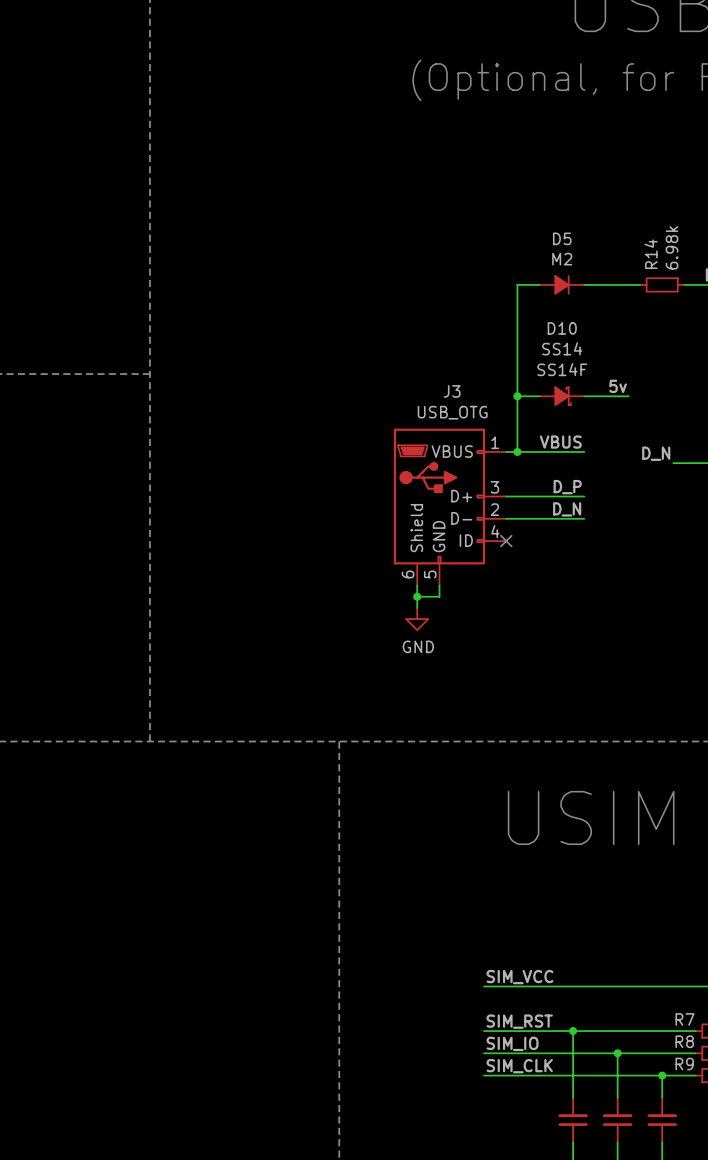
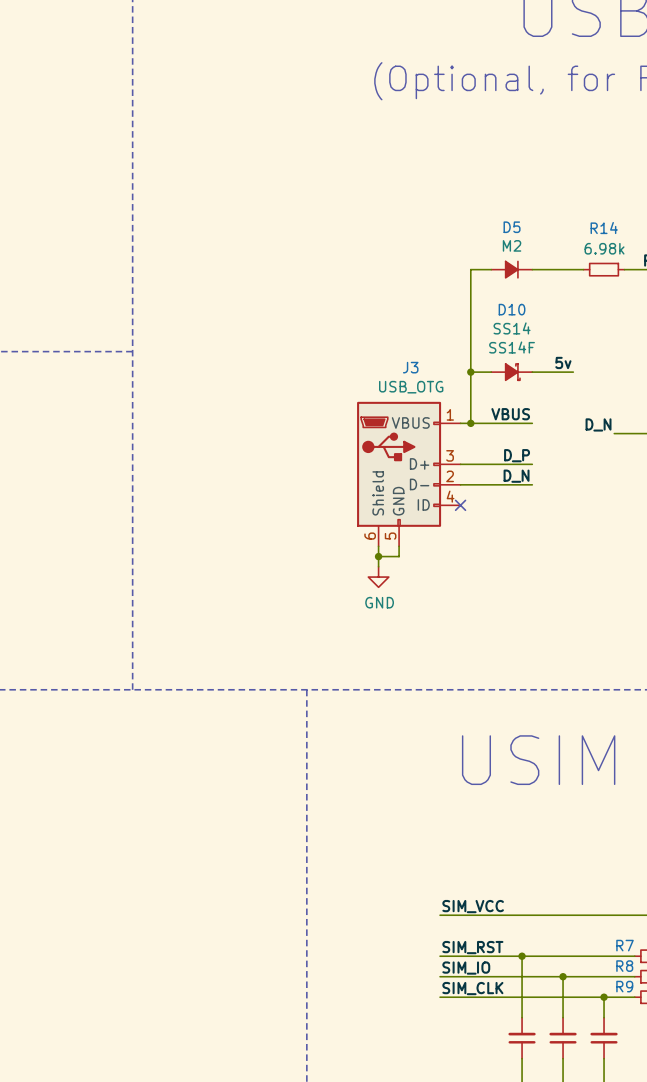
R14 value rotation: 0° (672, 247) -> 90° clockwise (604, 248)
R14 name rotation: 0° (651, 254) -> 90° clockwise (604, 228)

